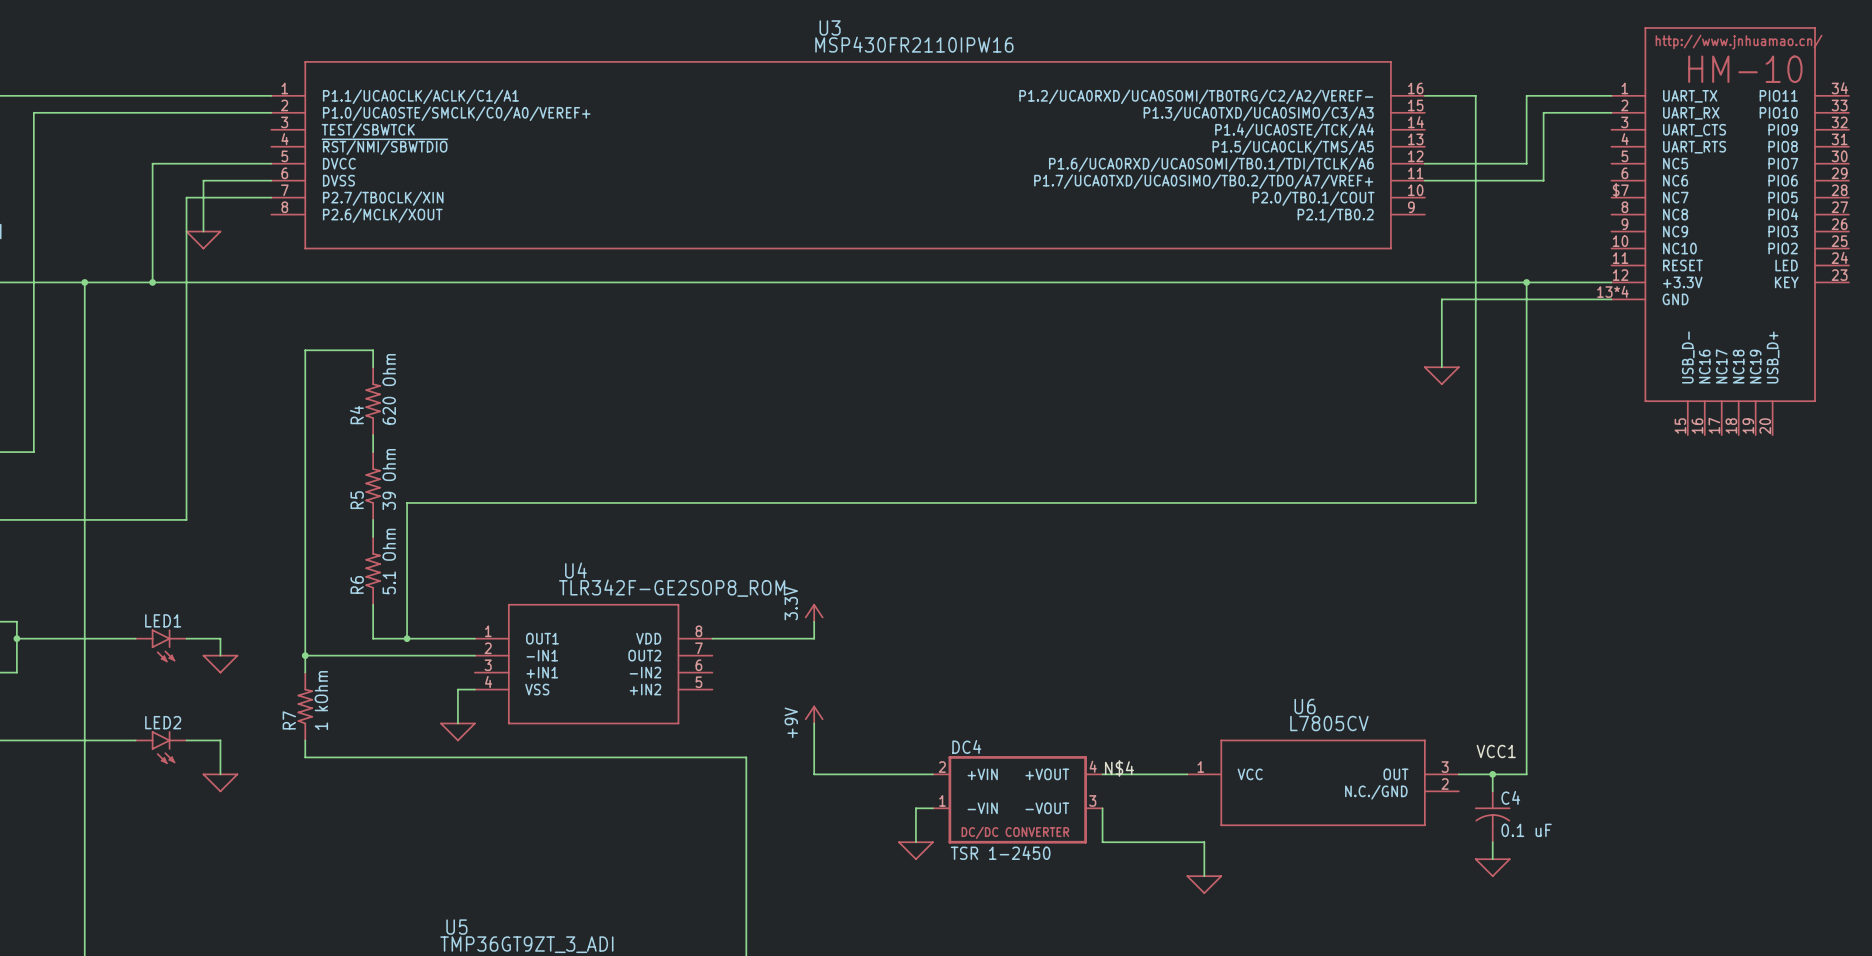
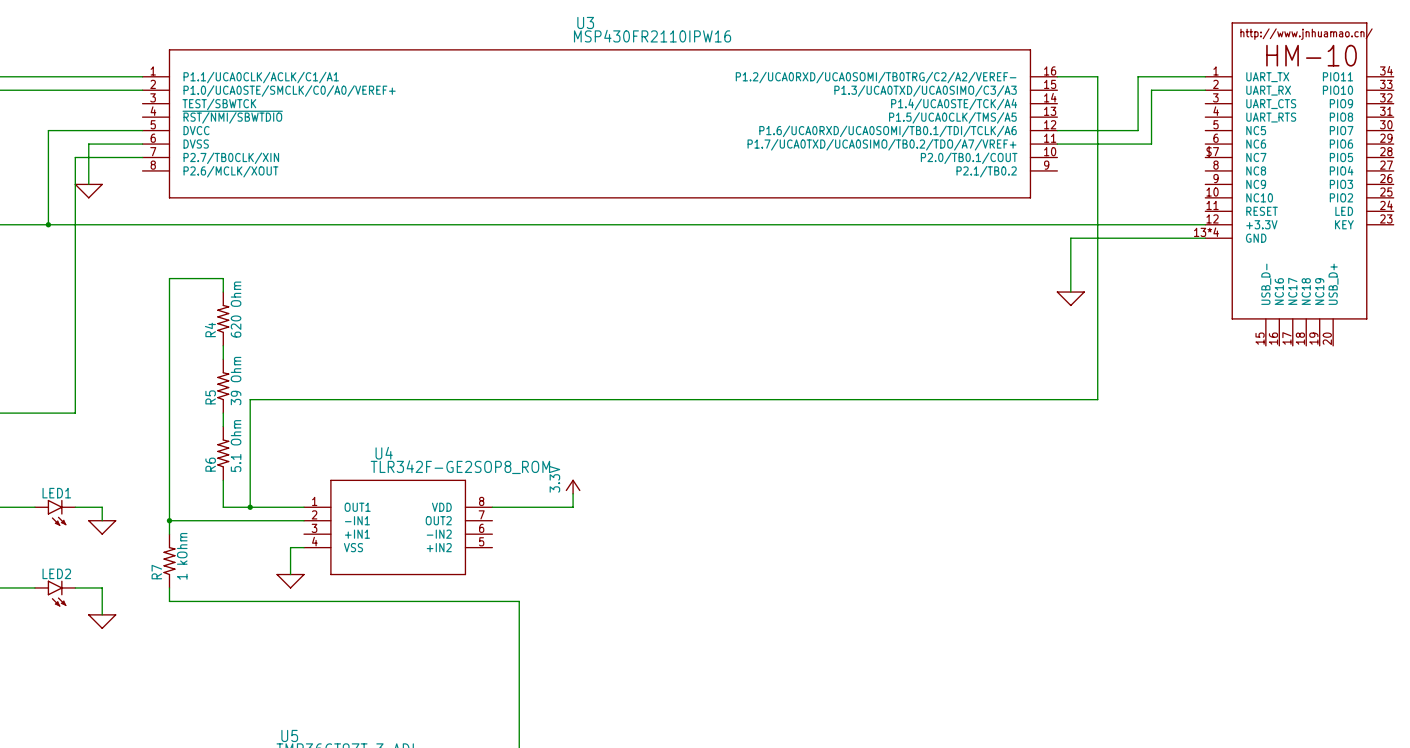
wire: (1526, 282) (1526, 774) (1458, 774) -> none
junction: (1526, 282) -> none
power symbol: +9V (814, 714) -> none
wire: (814, 723) (814, 774) (932, 774) -> none
label: VCC1 (1496, 751) -> none
label: N$4 (1119, 768) -> none
wire: (1102, 774) (1187, 774) -> none
wire: (1492, 774) (1492, 791) -> none
junction: (1492, 774) -> none
U6: L7805CV (1323, 782) -> none
DC4: TSR 1-2450 (1017, 799) -> none
wire: (932, 808) (915, 808) (915, 842) -> none
wire: (1102, 808) (1102, 842) (1204, 842) (1204, 876) -> none
C4: 0.1 uF (1492, 816) -> none
wire: (1492, 842) (1492, 859) -> none
power symbol: (915, 850) -> none
power symbol: (1492, 867) -> none
power symbol: (1204, 884) -> none

